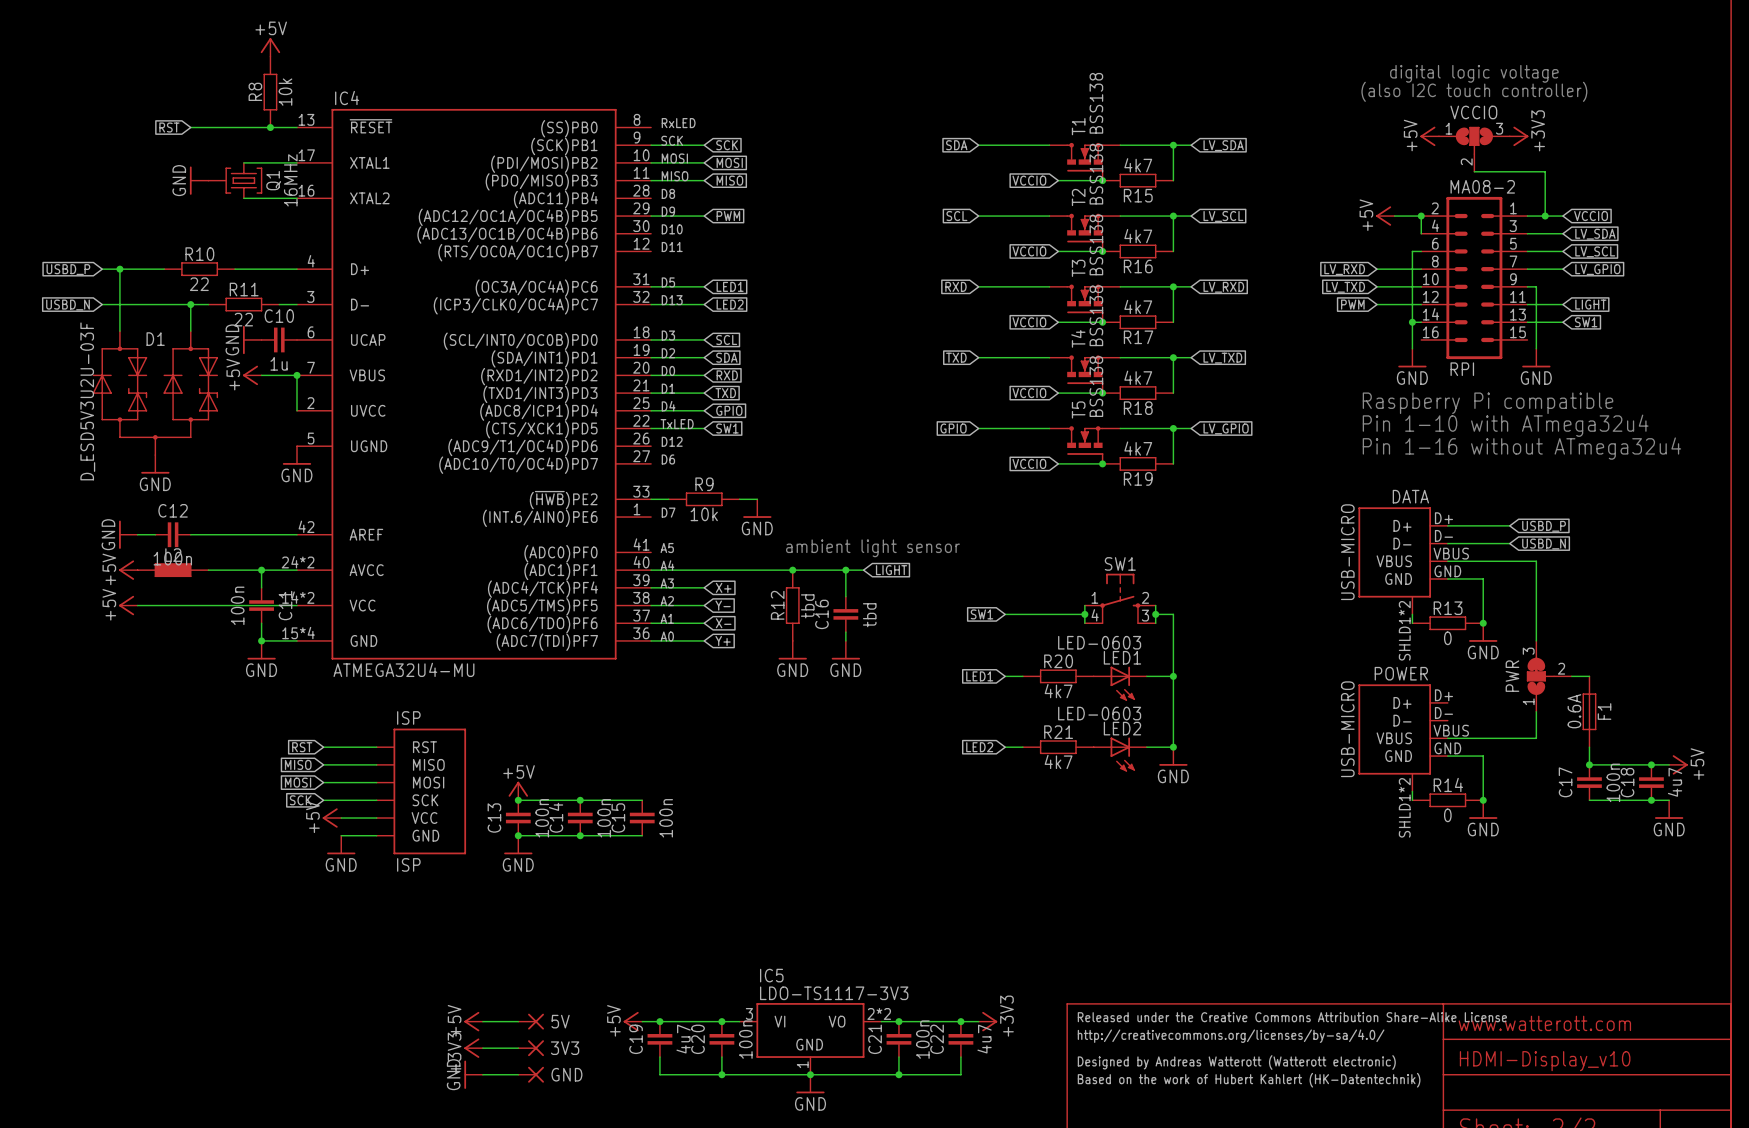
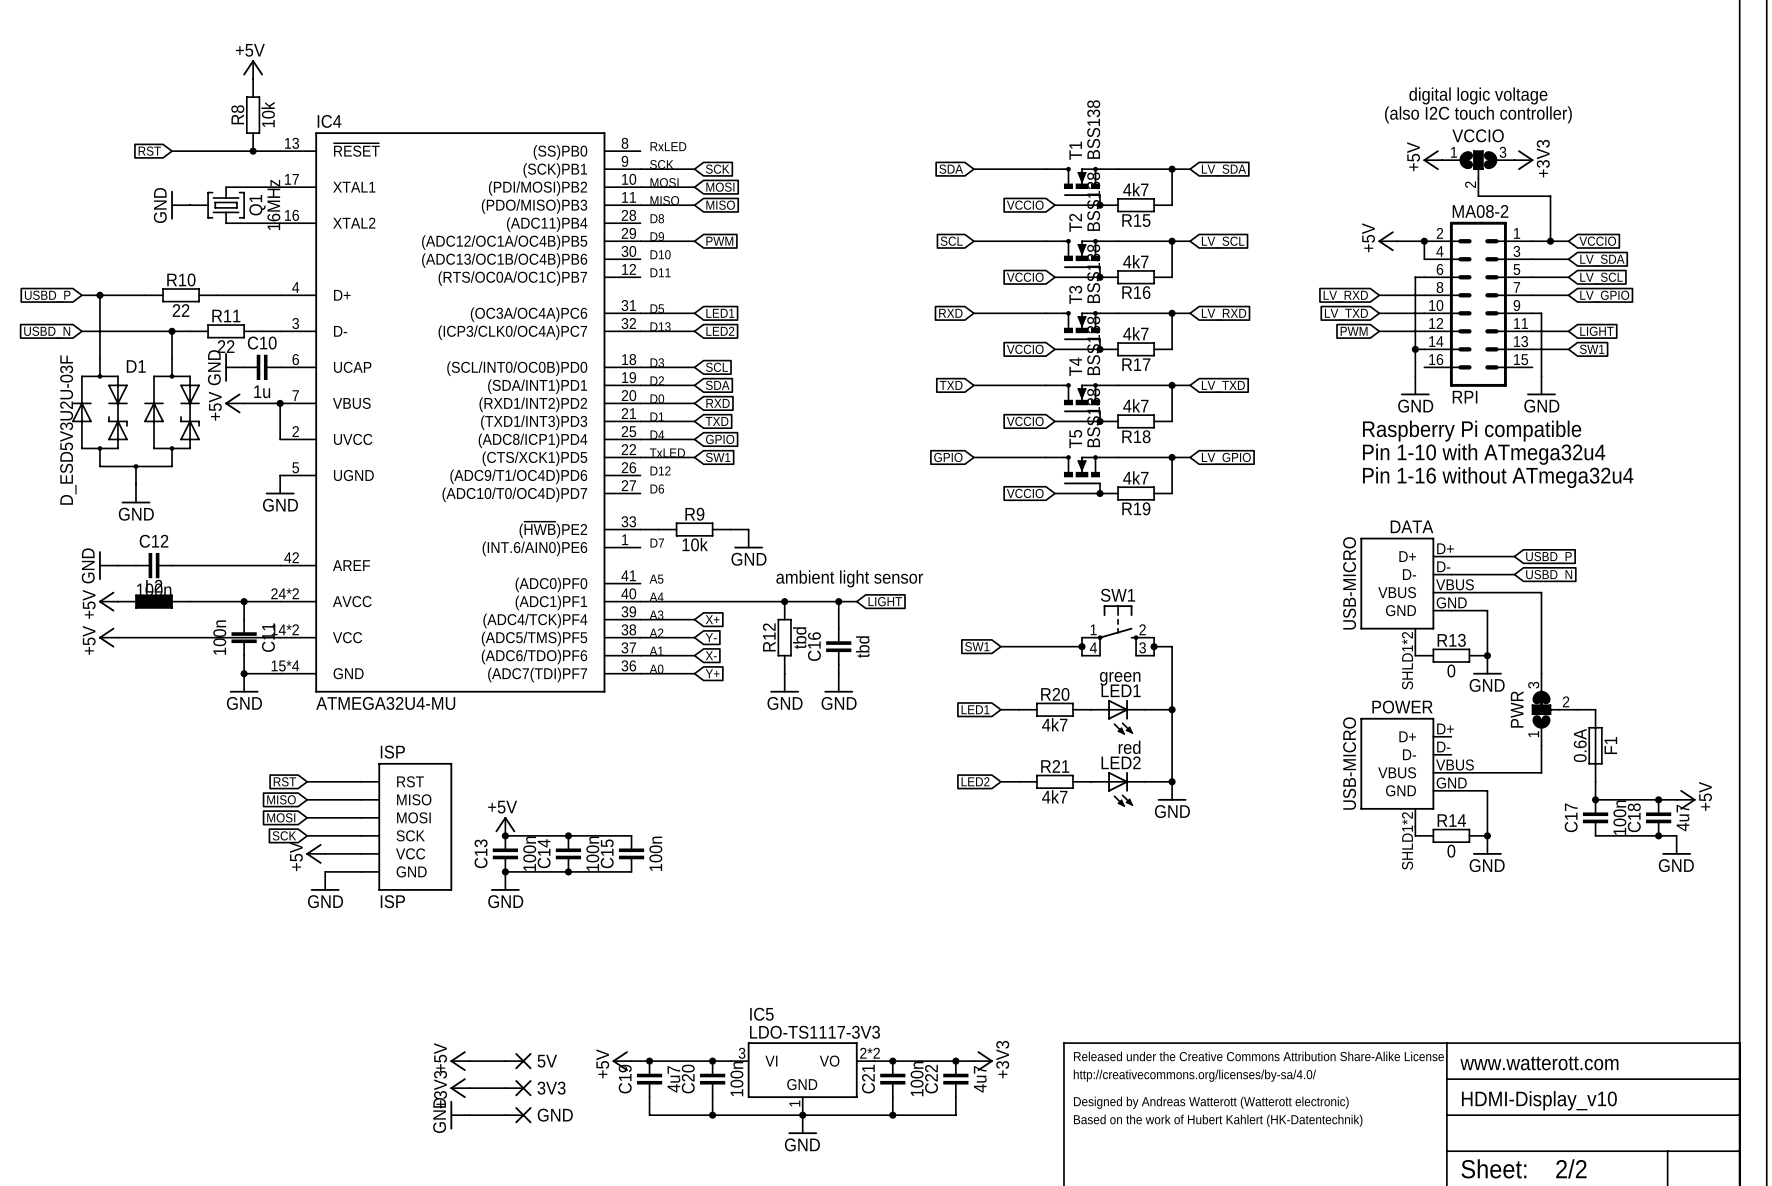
LED1 value: LED-0603 (1099, 642) -> green (1120, 678)
LED2 value: LED-0603 (1099, 713) -> red (1129, 747)

